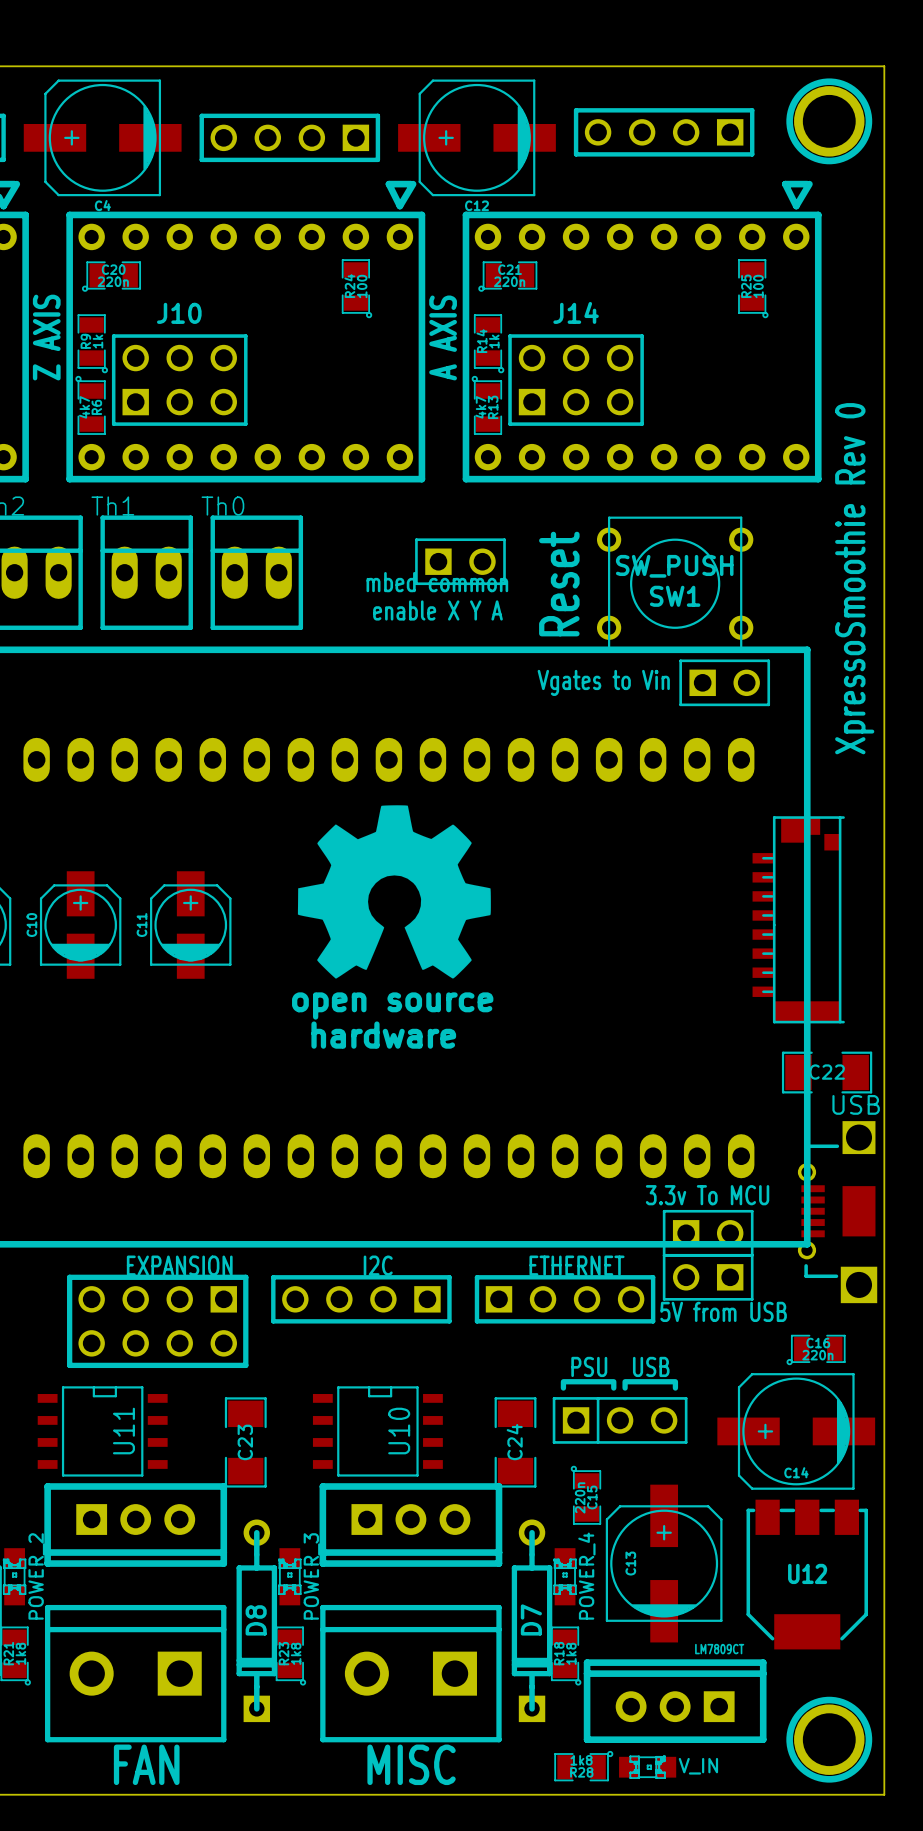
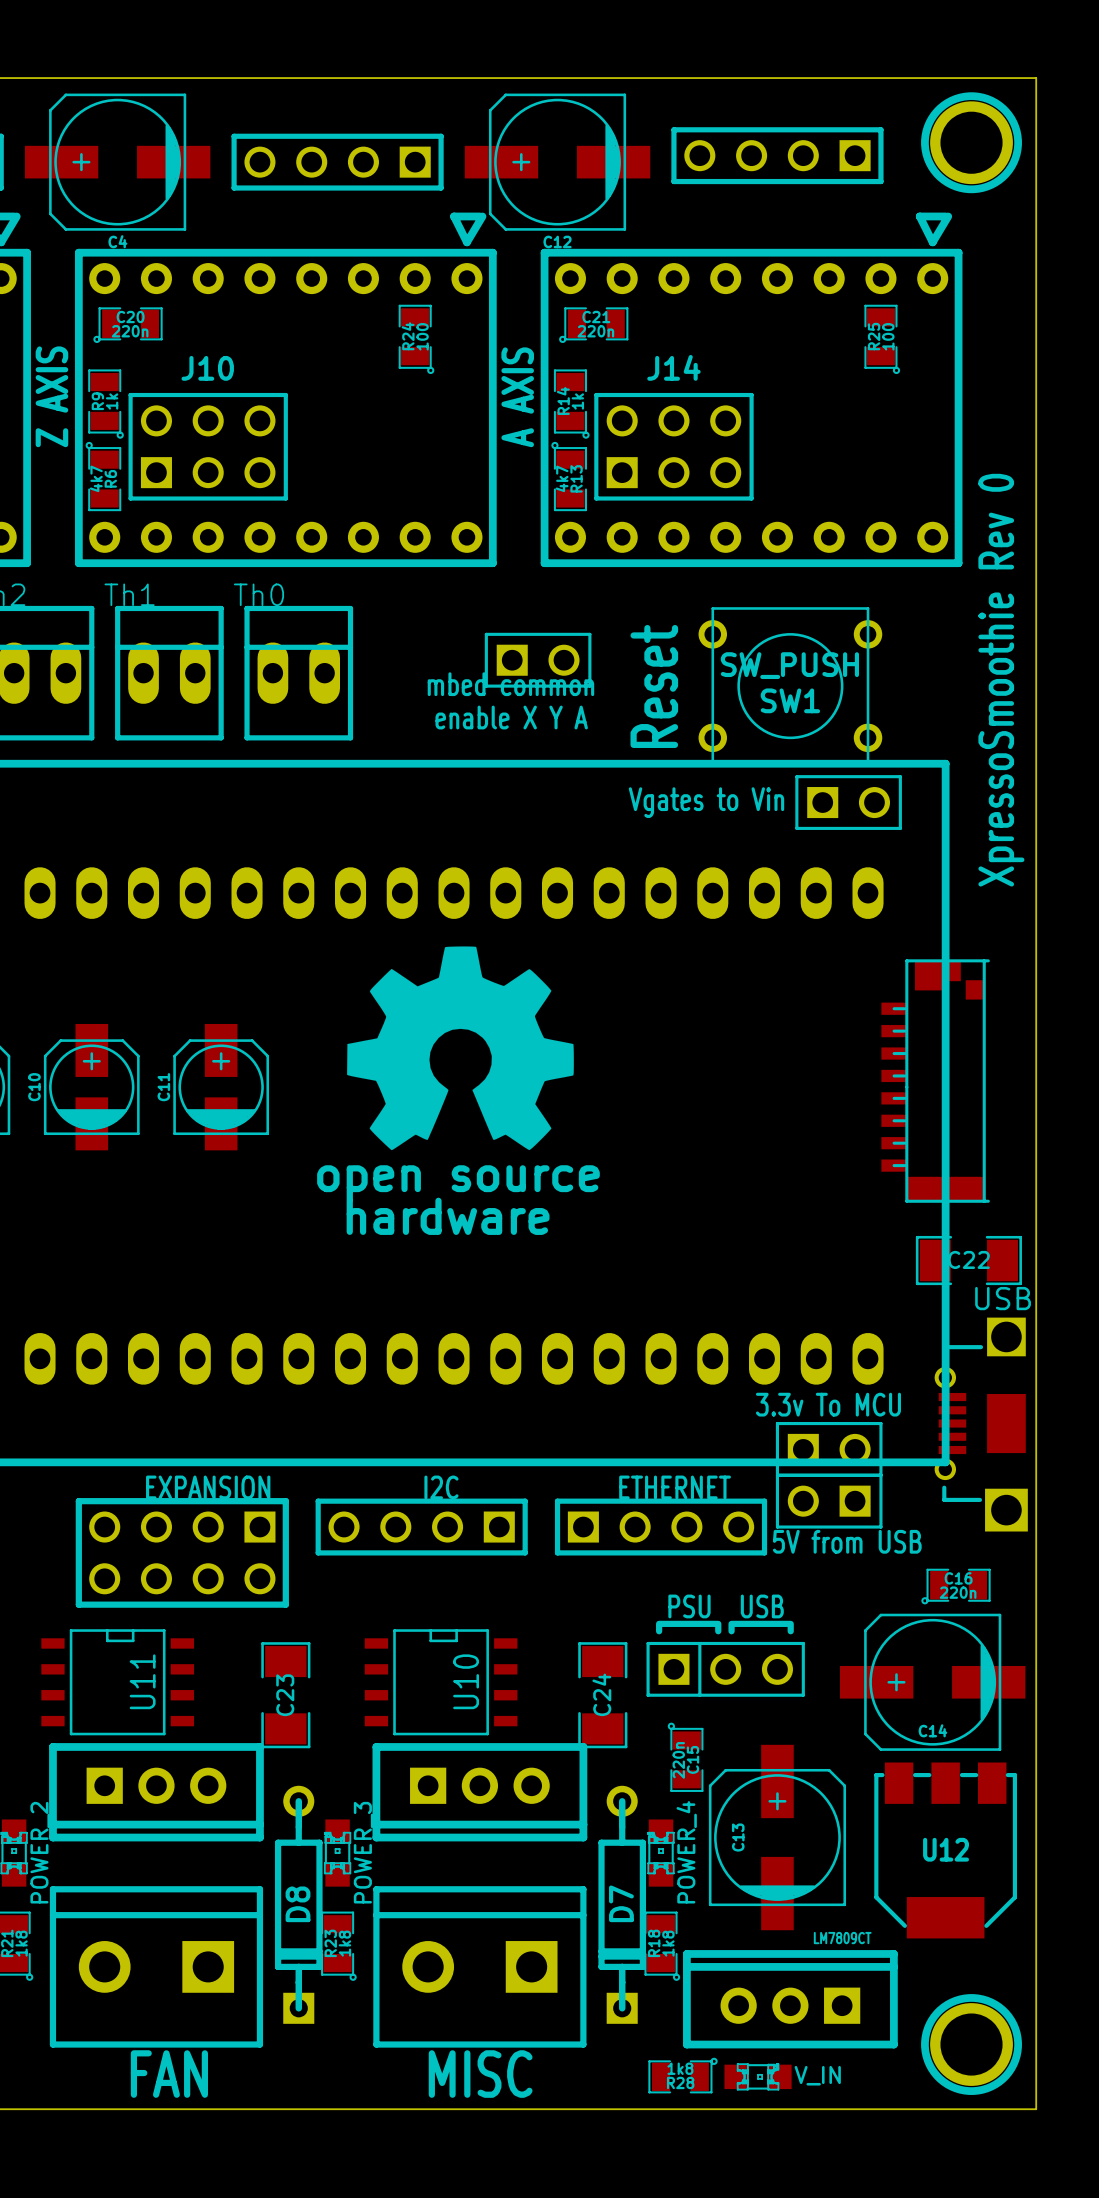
drawing shape: [292, 805, 494, 1049] -> [317, 946, 600, 1235]

